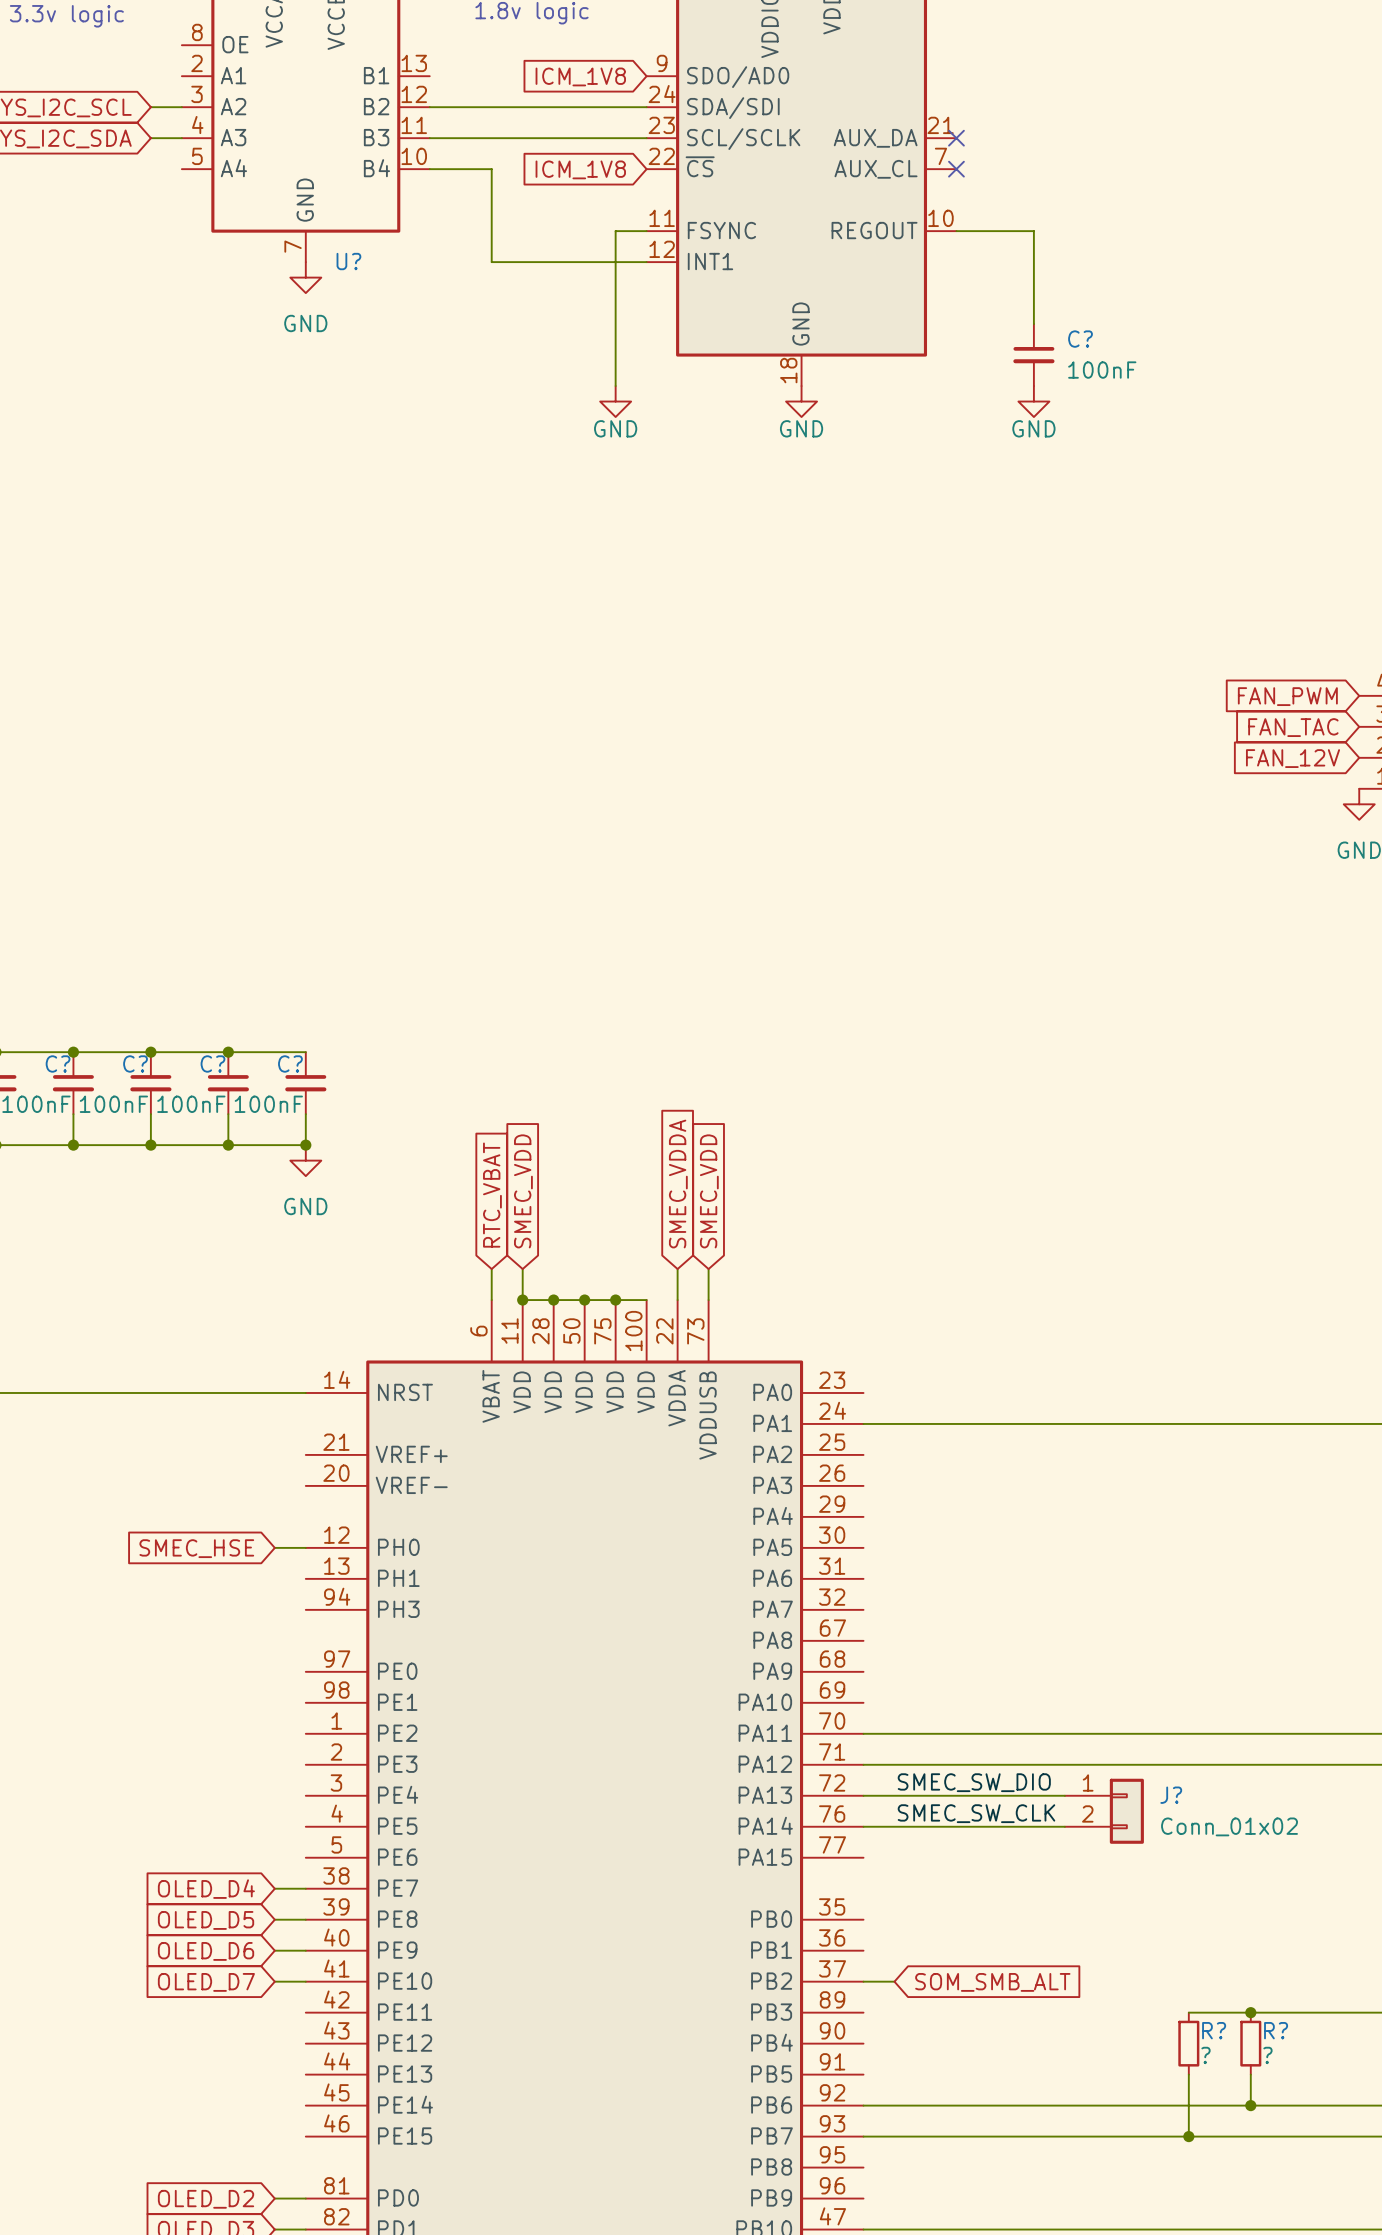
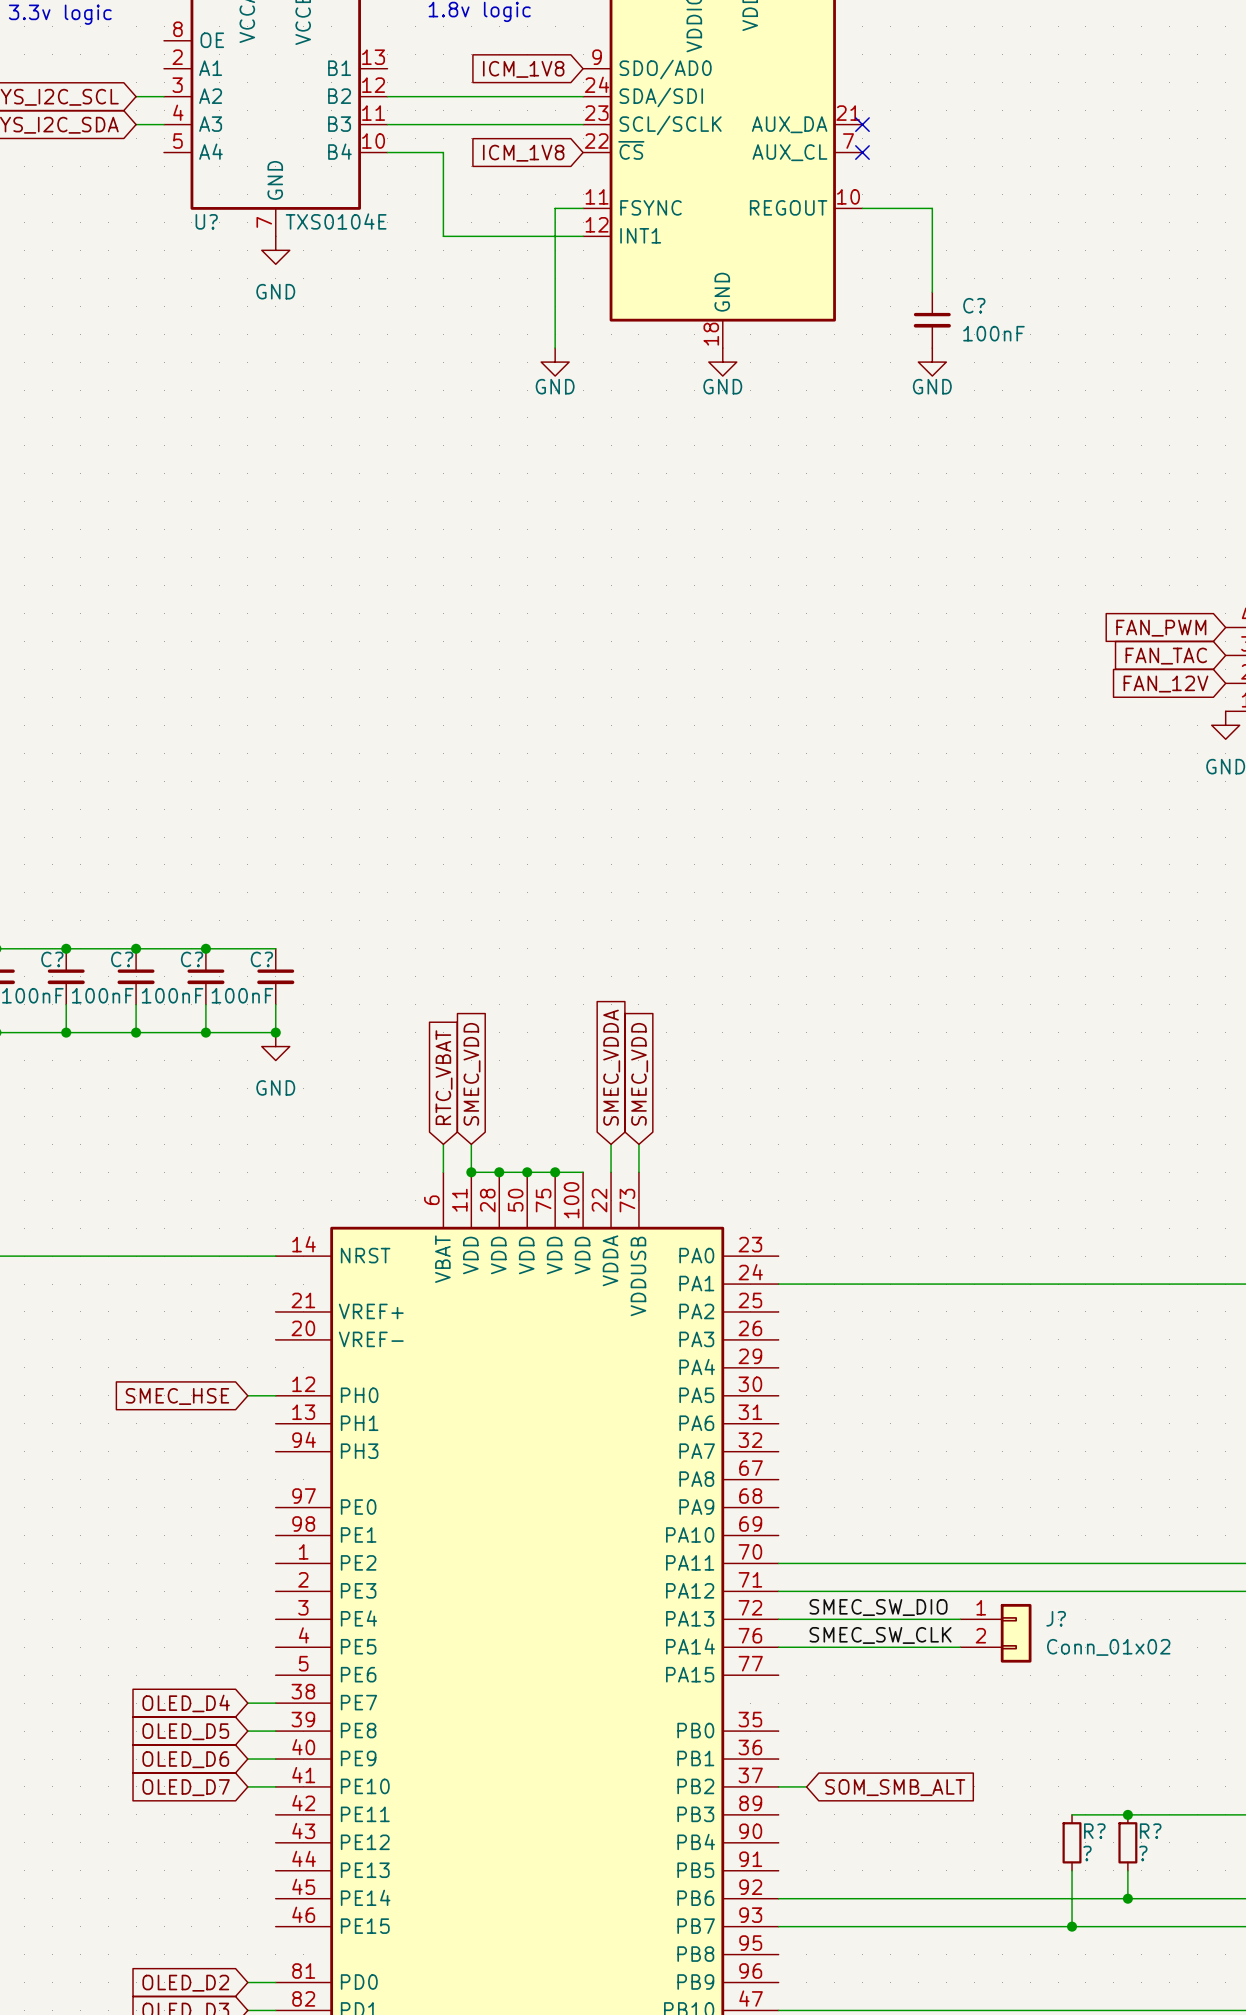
U? value: none -> TXS0104E (336, 221)
U? name position: U? (348, 261) -> U? (206, 221)

